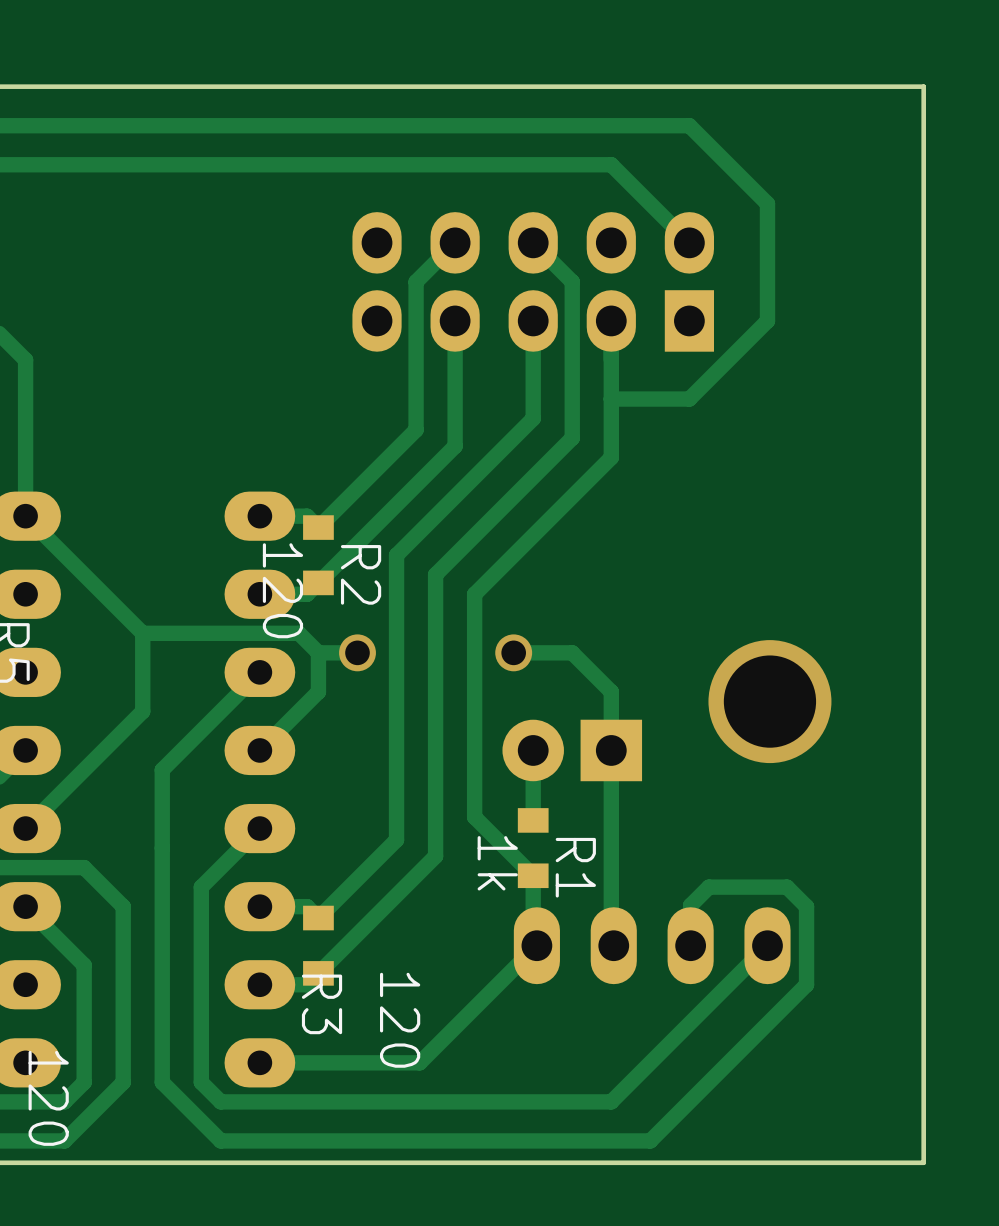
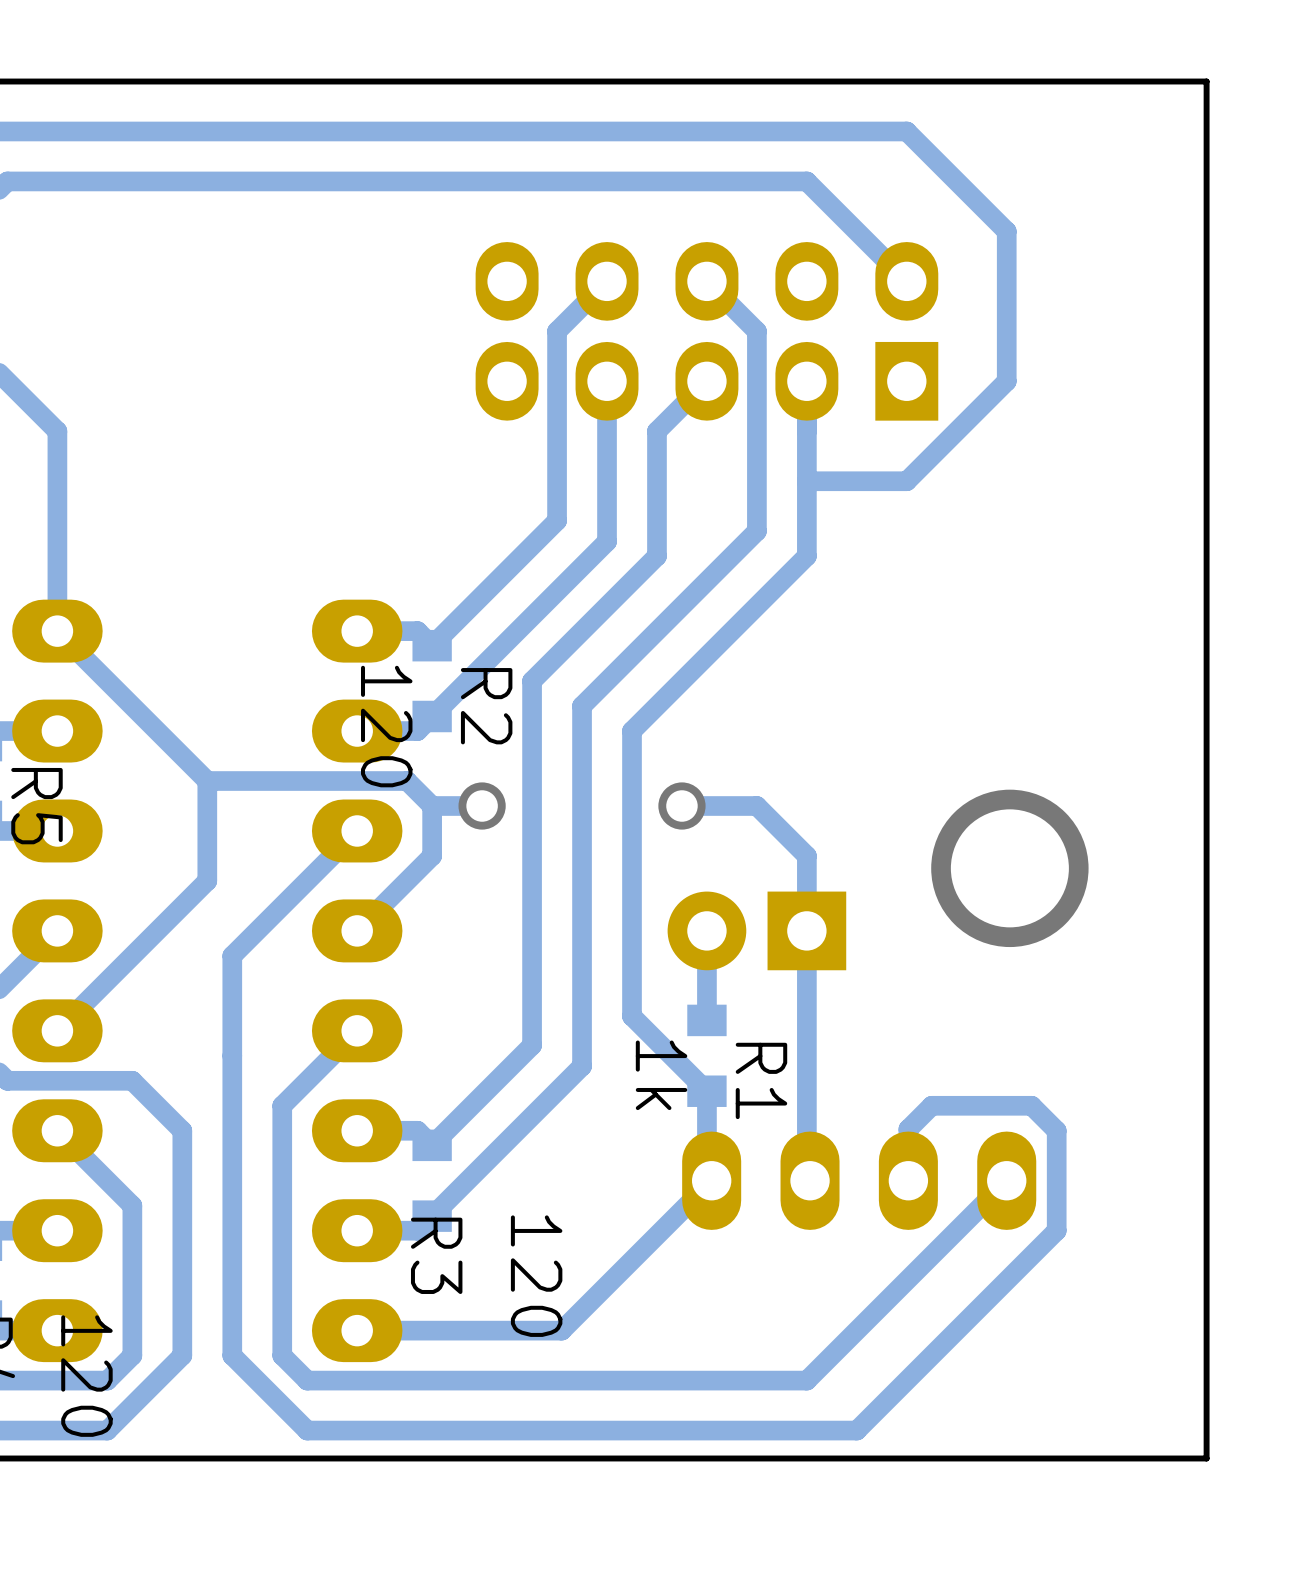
track: (533, 320) (533, 418) (494, 457) -> (706, 381) (656, 431) (656, 556)

